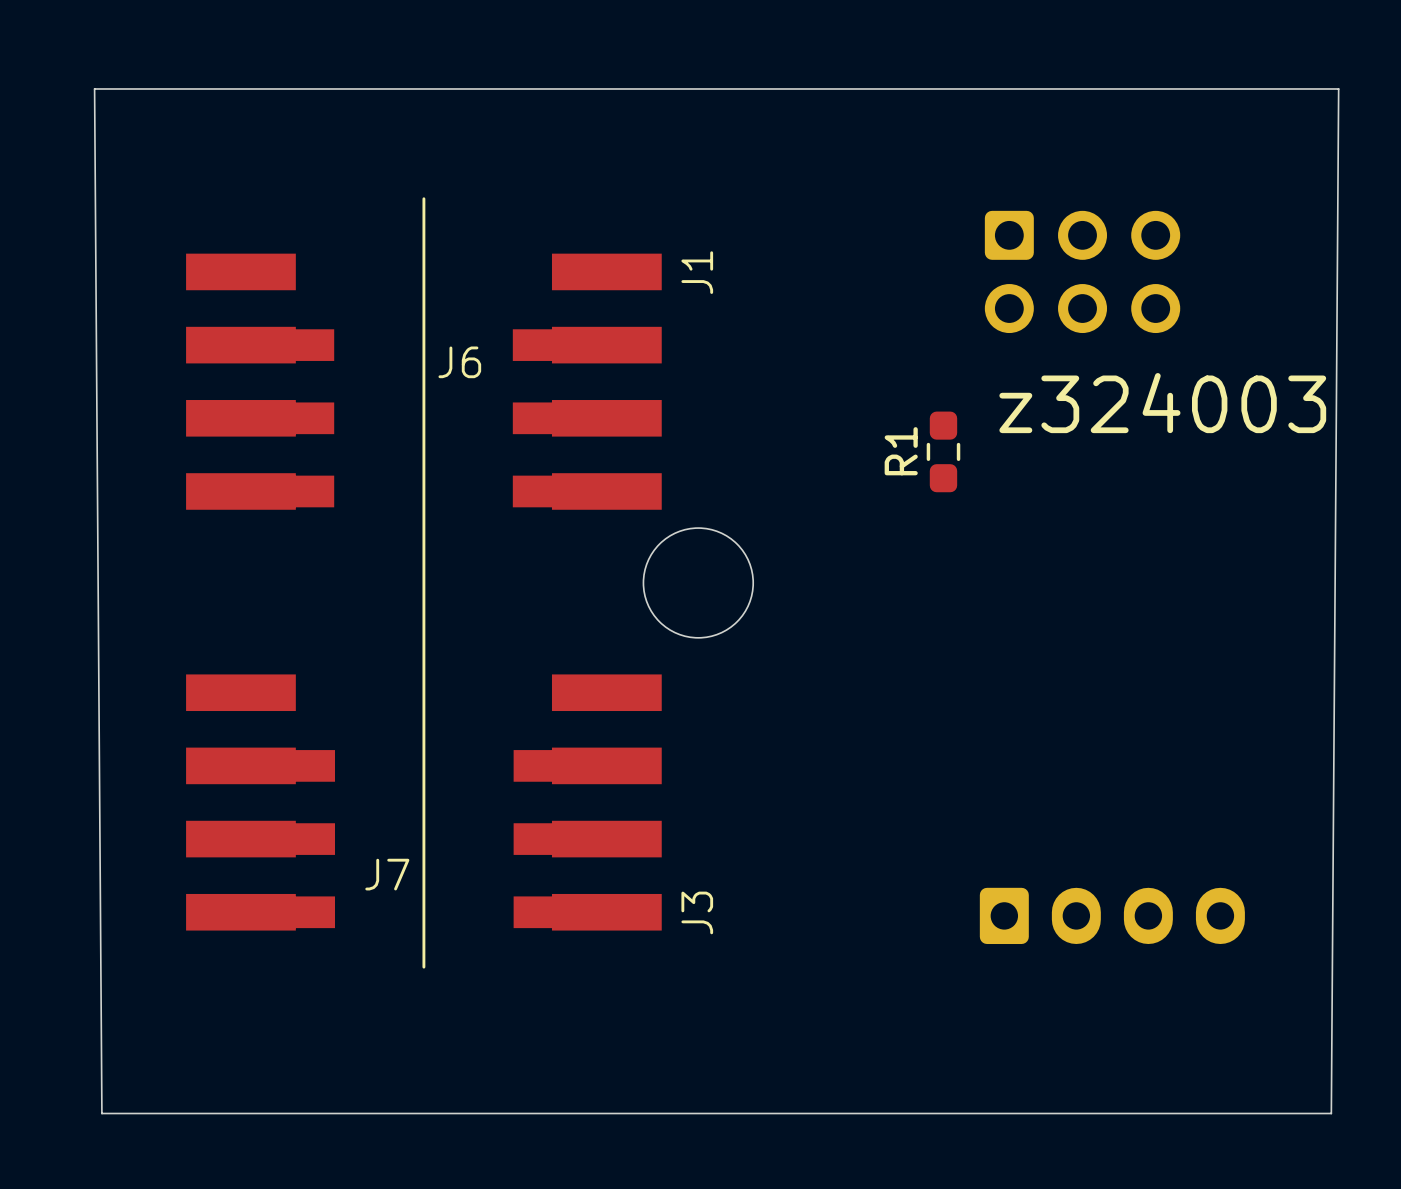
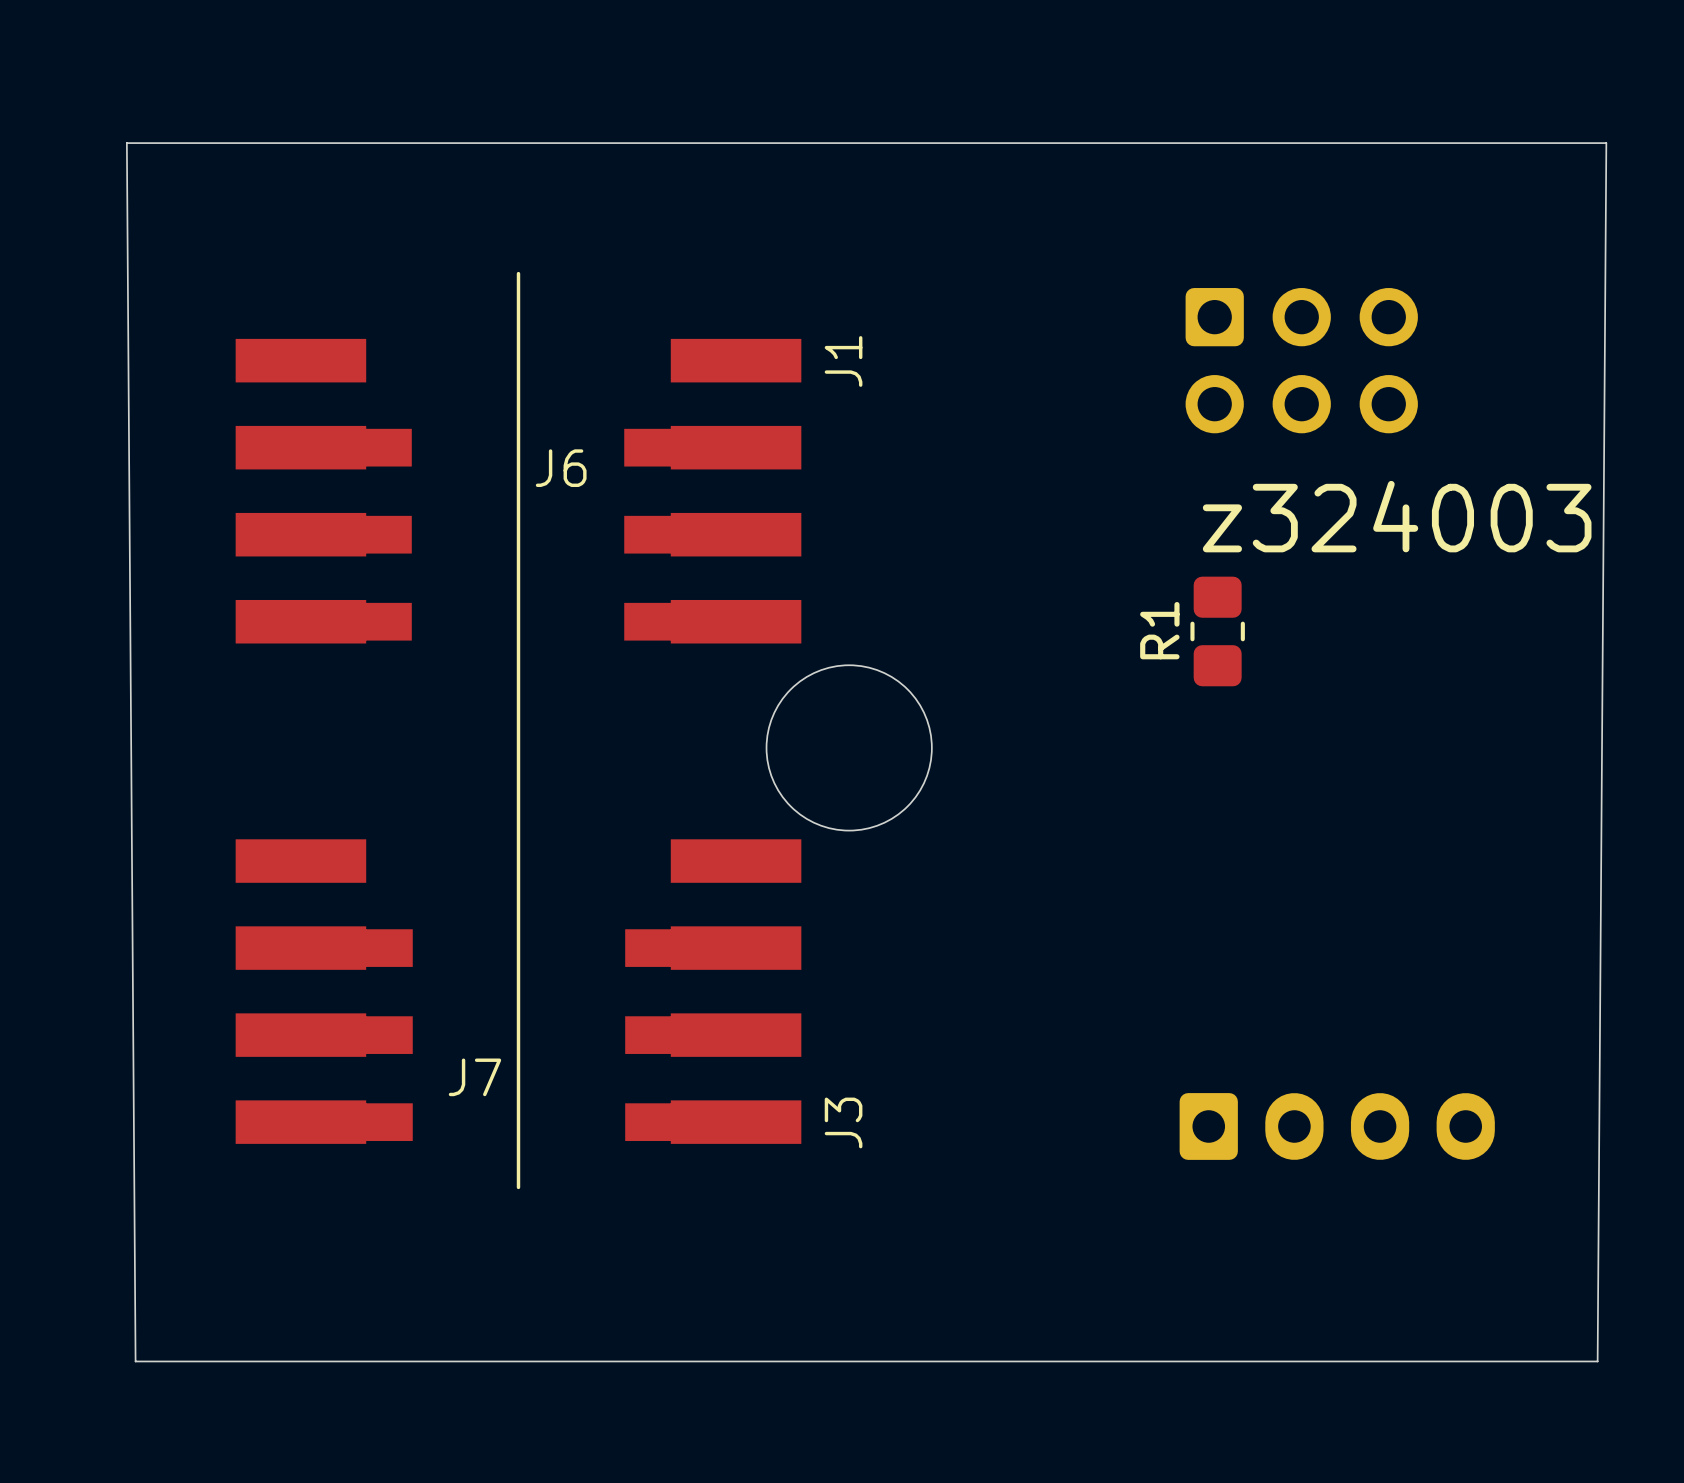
R1 footprint: [926, 411, 961, 493] -> [1190, 576, 1245, 687]
round board edge size: [642, 527, 754, 639] -> [765, 664, 933, 832]

